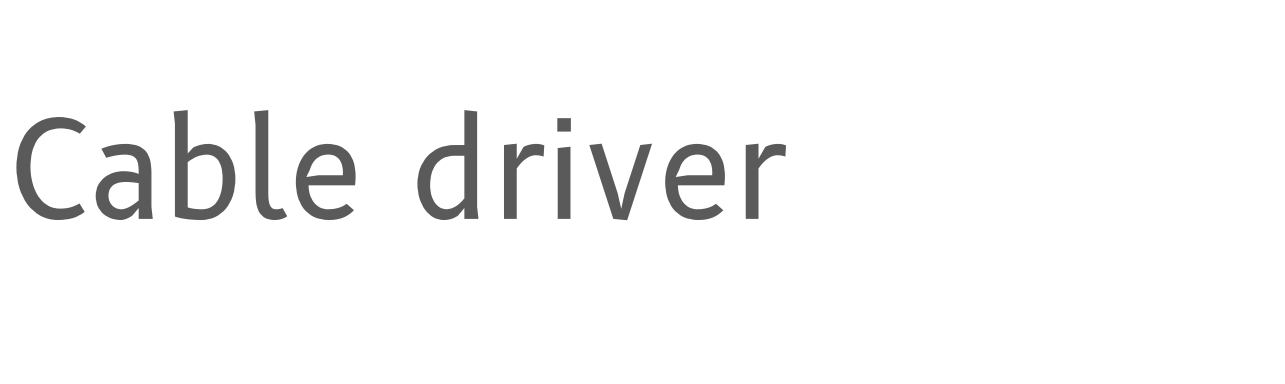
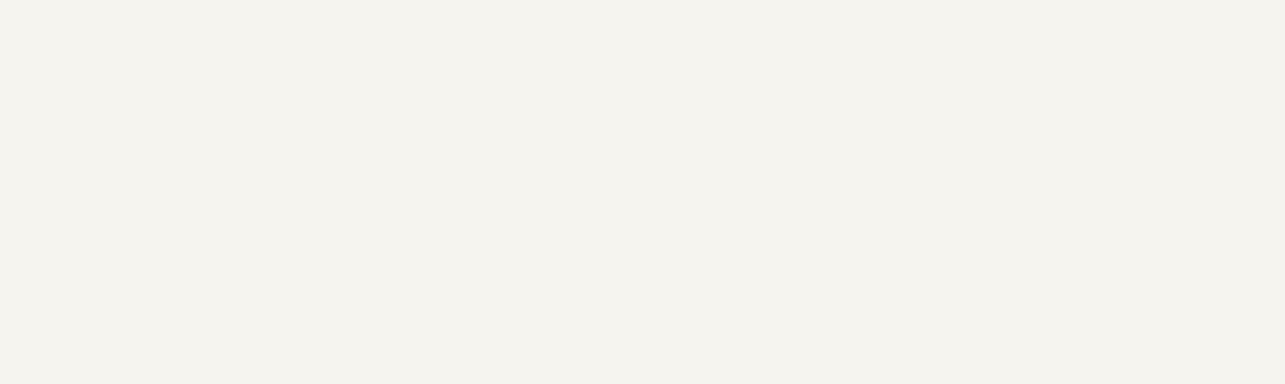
text: Cable driver (401, 165) -> none

